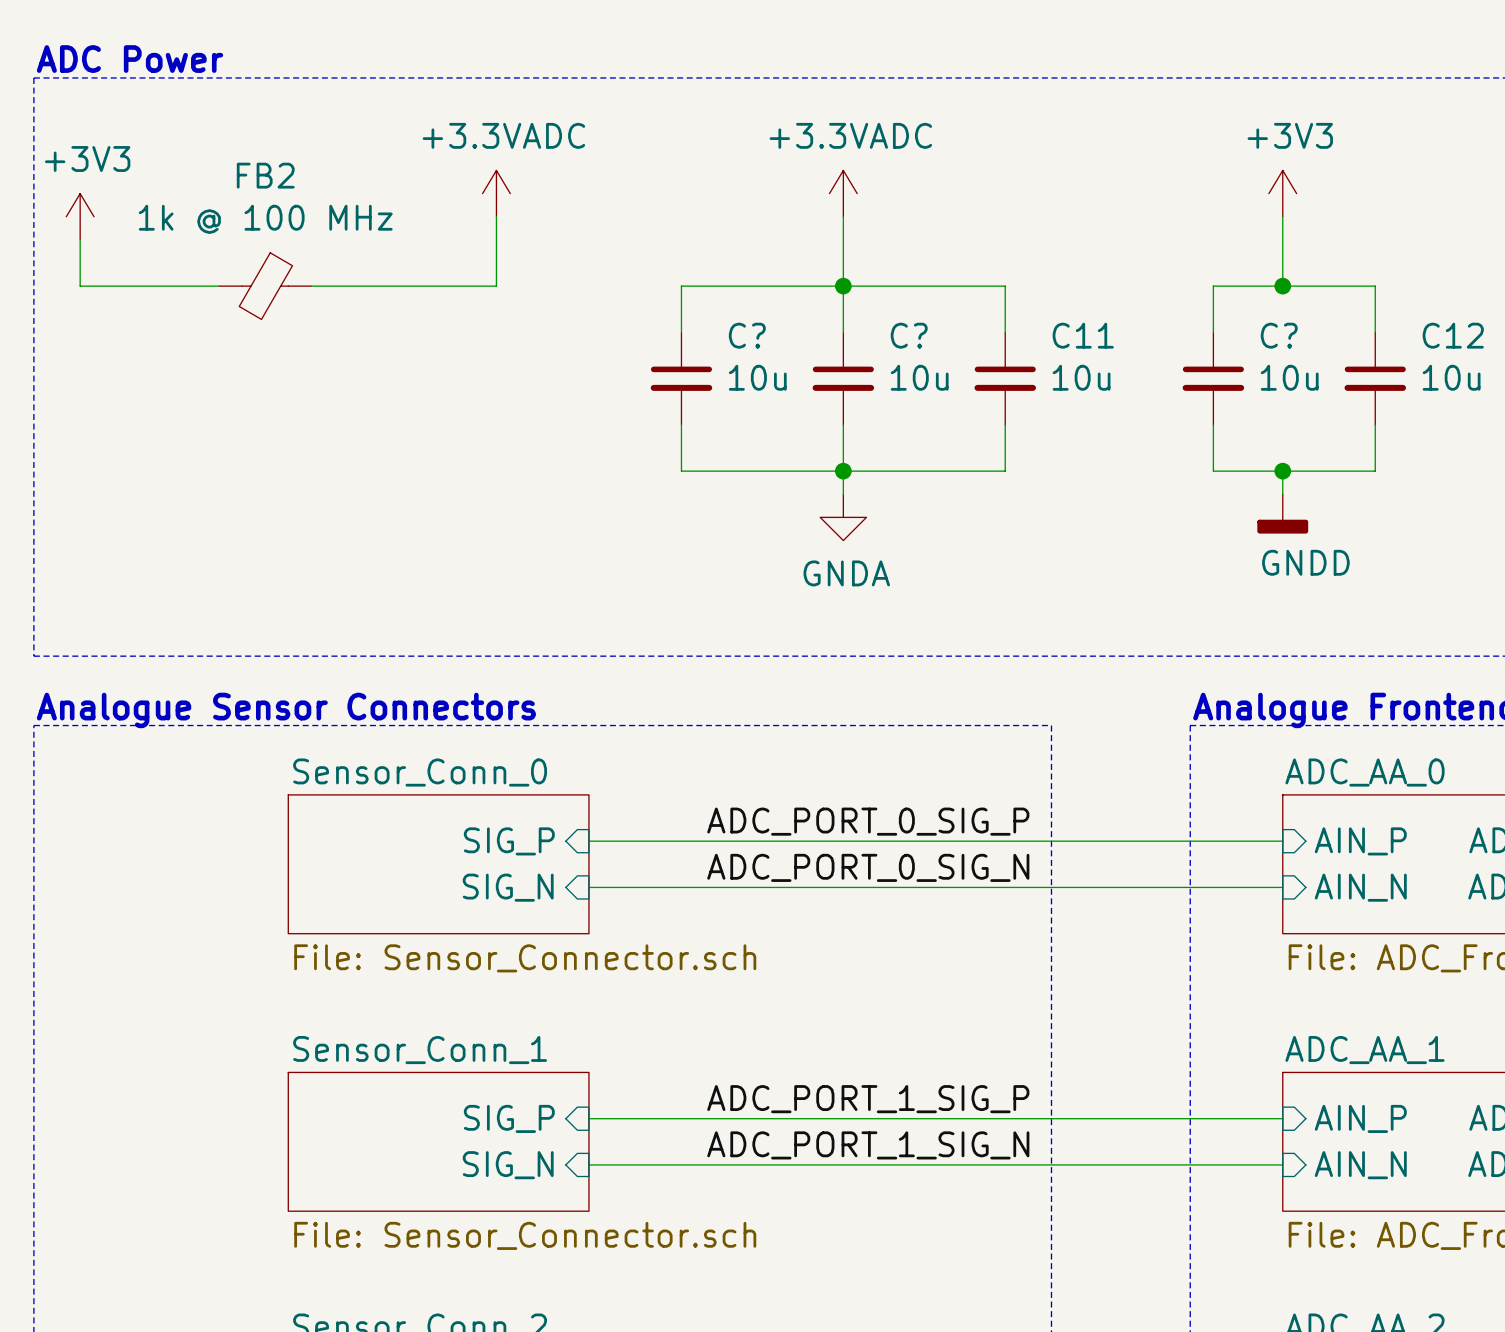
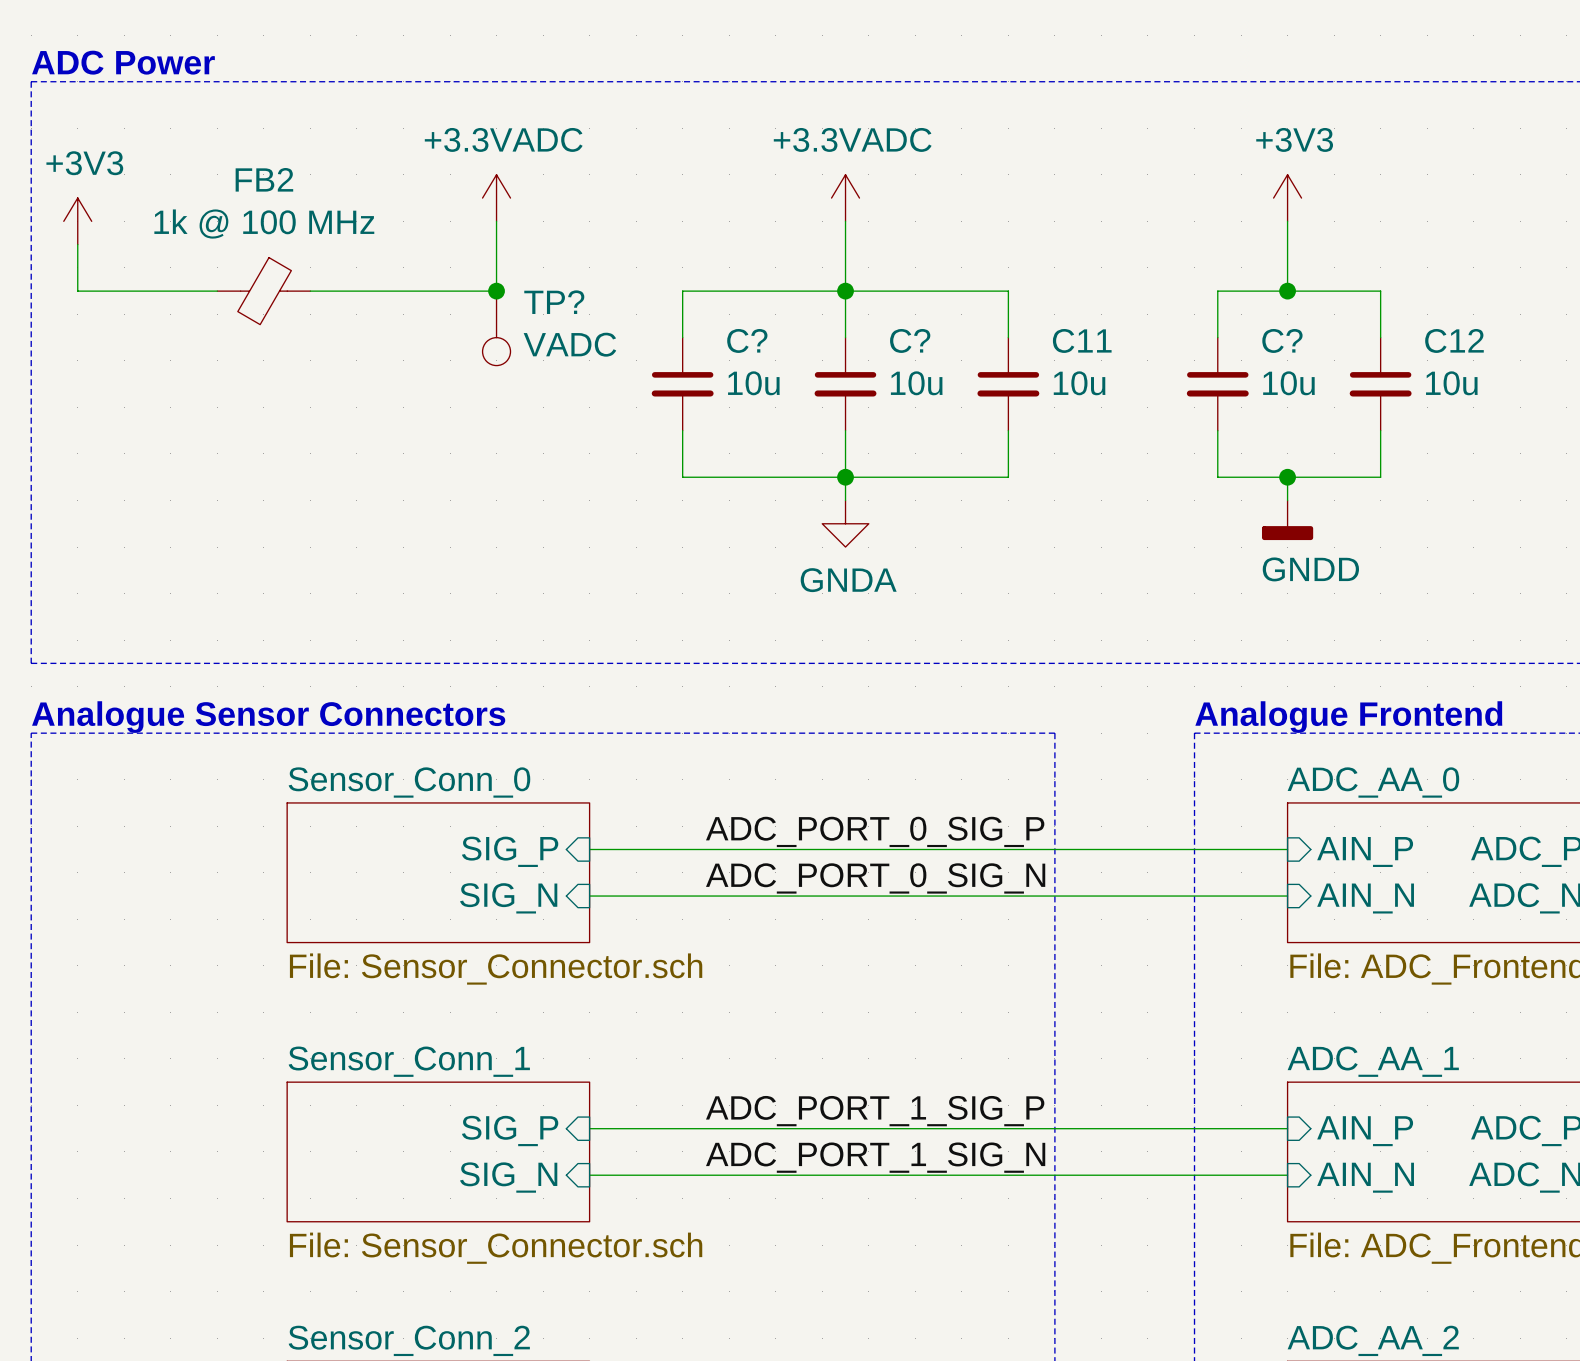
junction: none -> (496, 291)
TP?: none -> VADC (496, 328)

